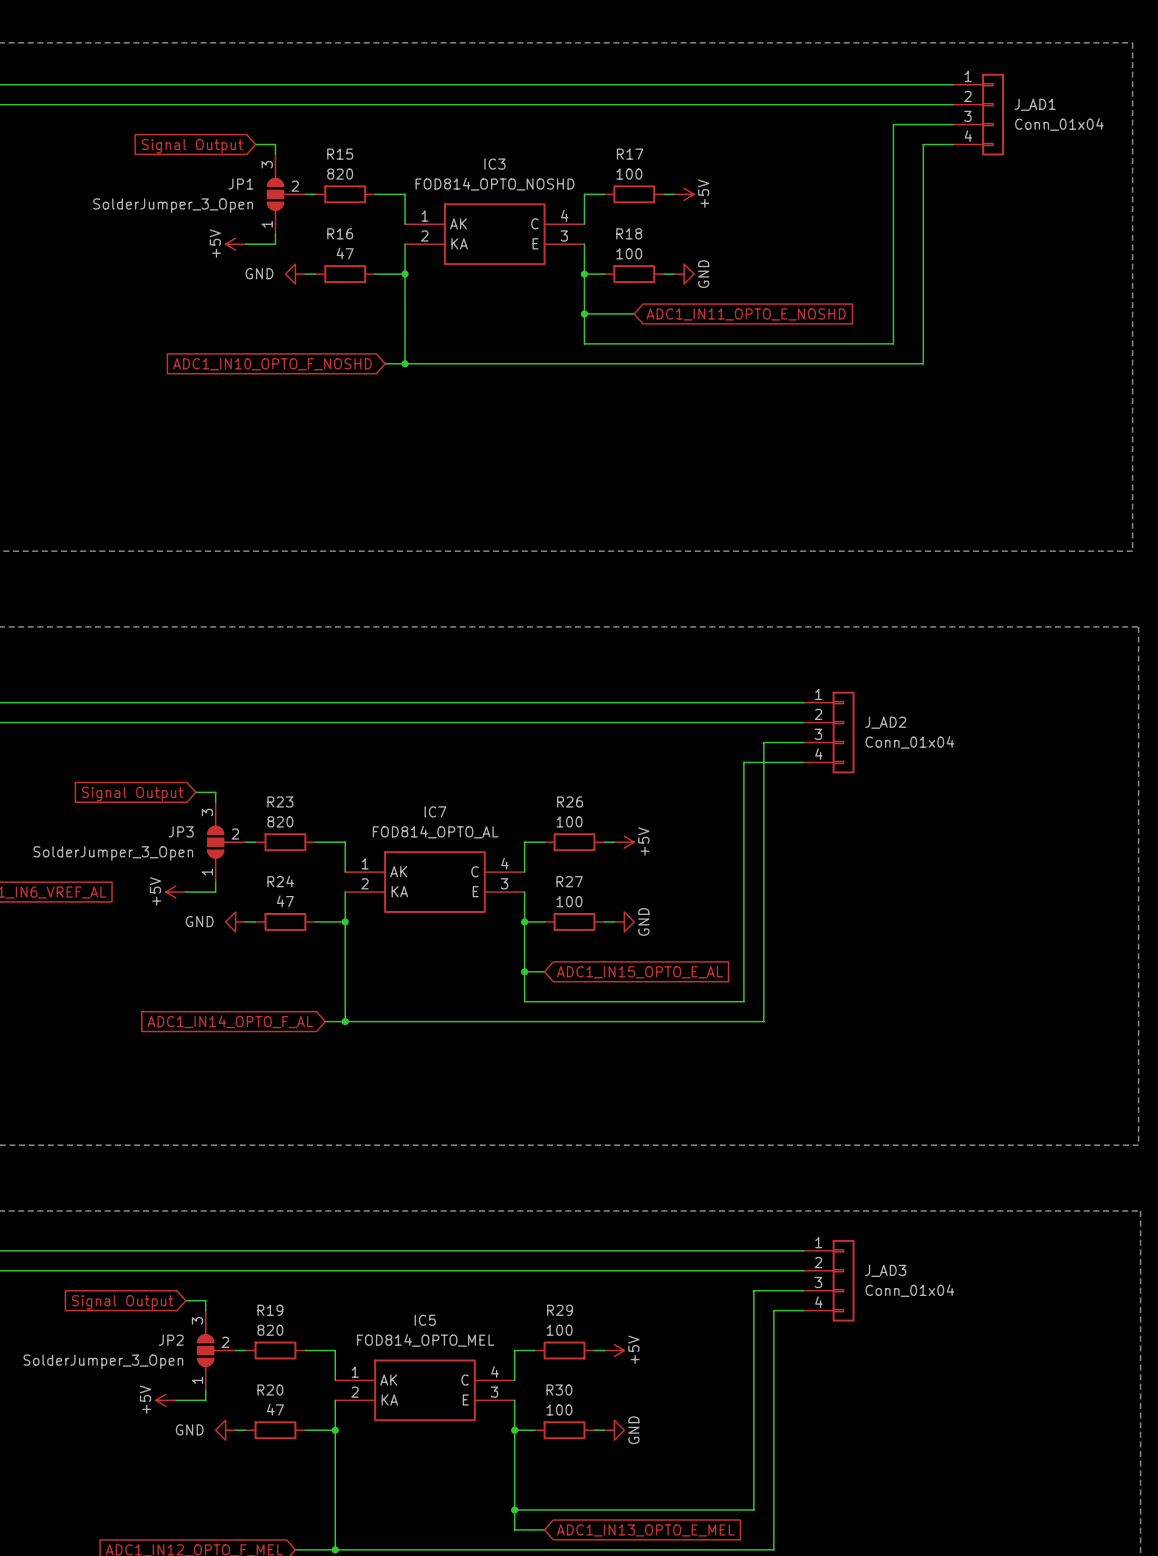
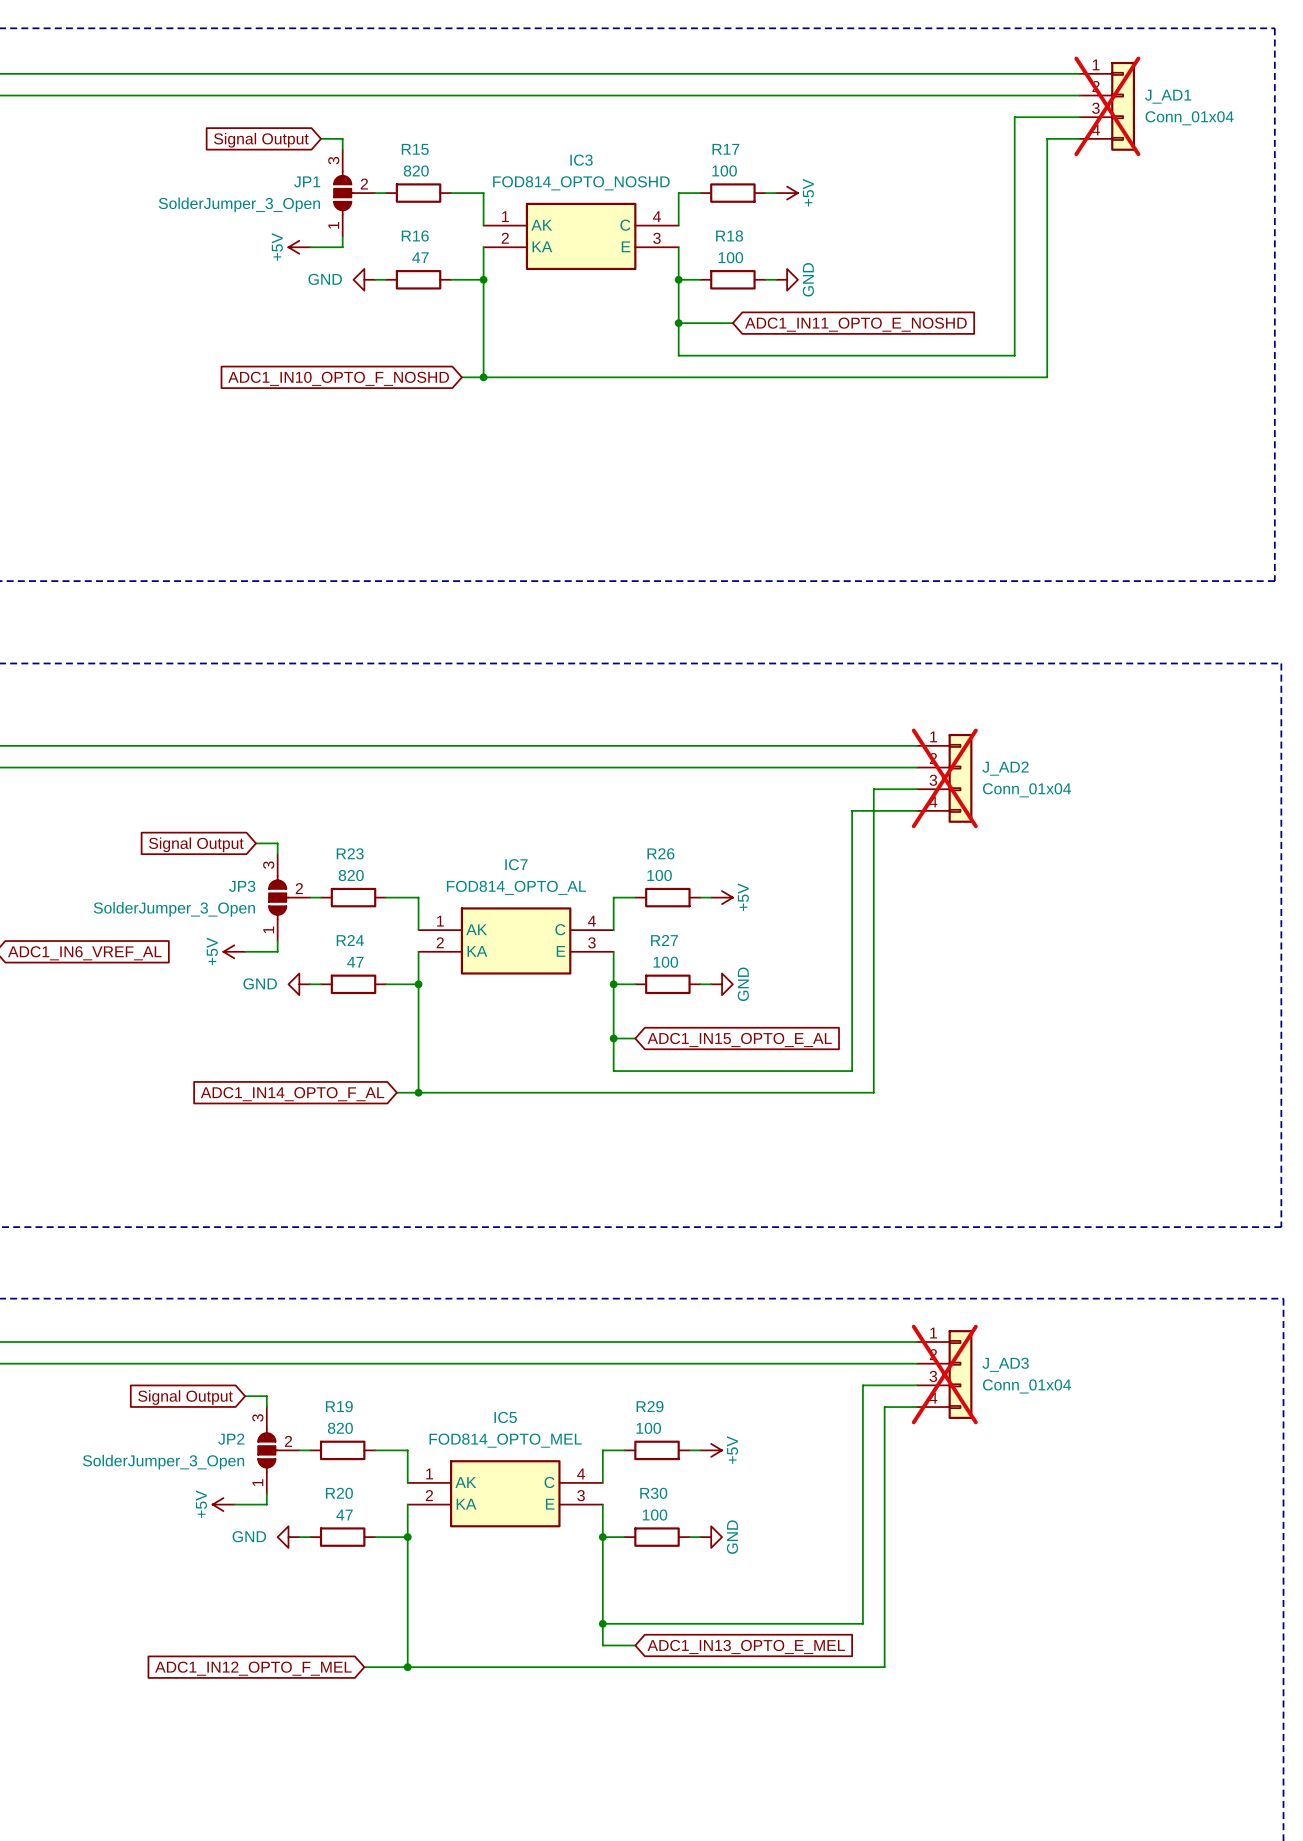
J_AD1 do-not-place cross: none -> (1107, 106)
J_AD2 do-not-place cross: none -> (944, 778)
J_AD3 do-not-place cross: none -> (944, 1374)

